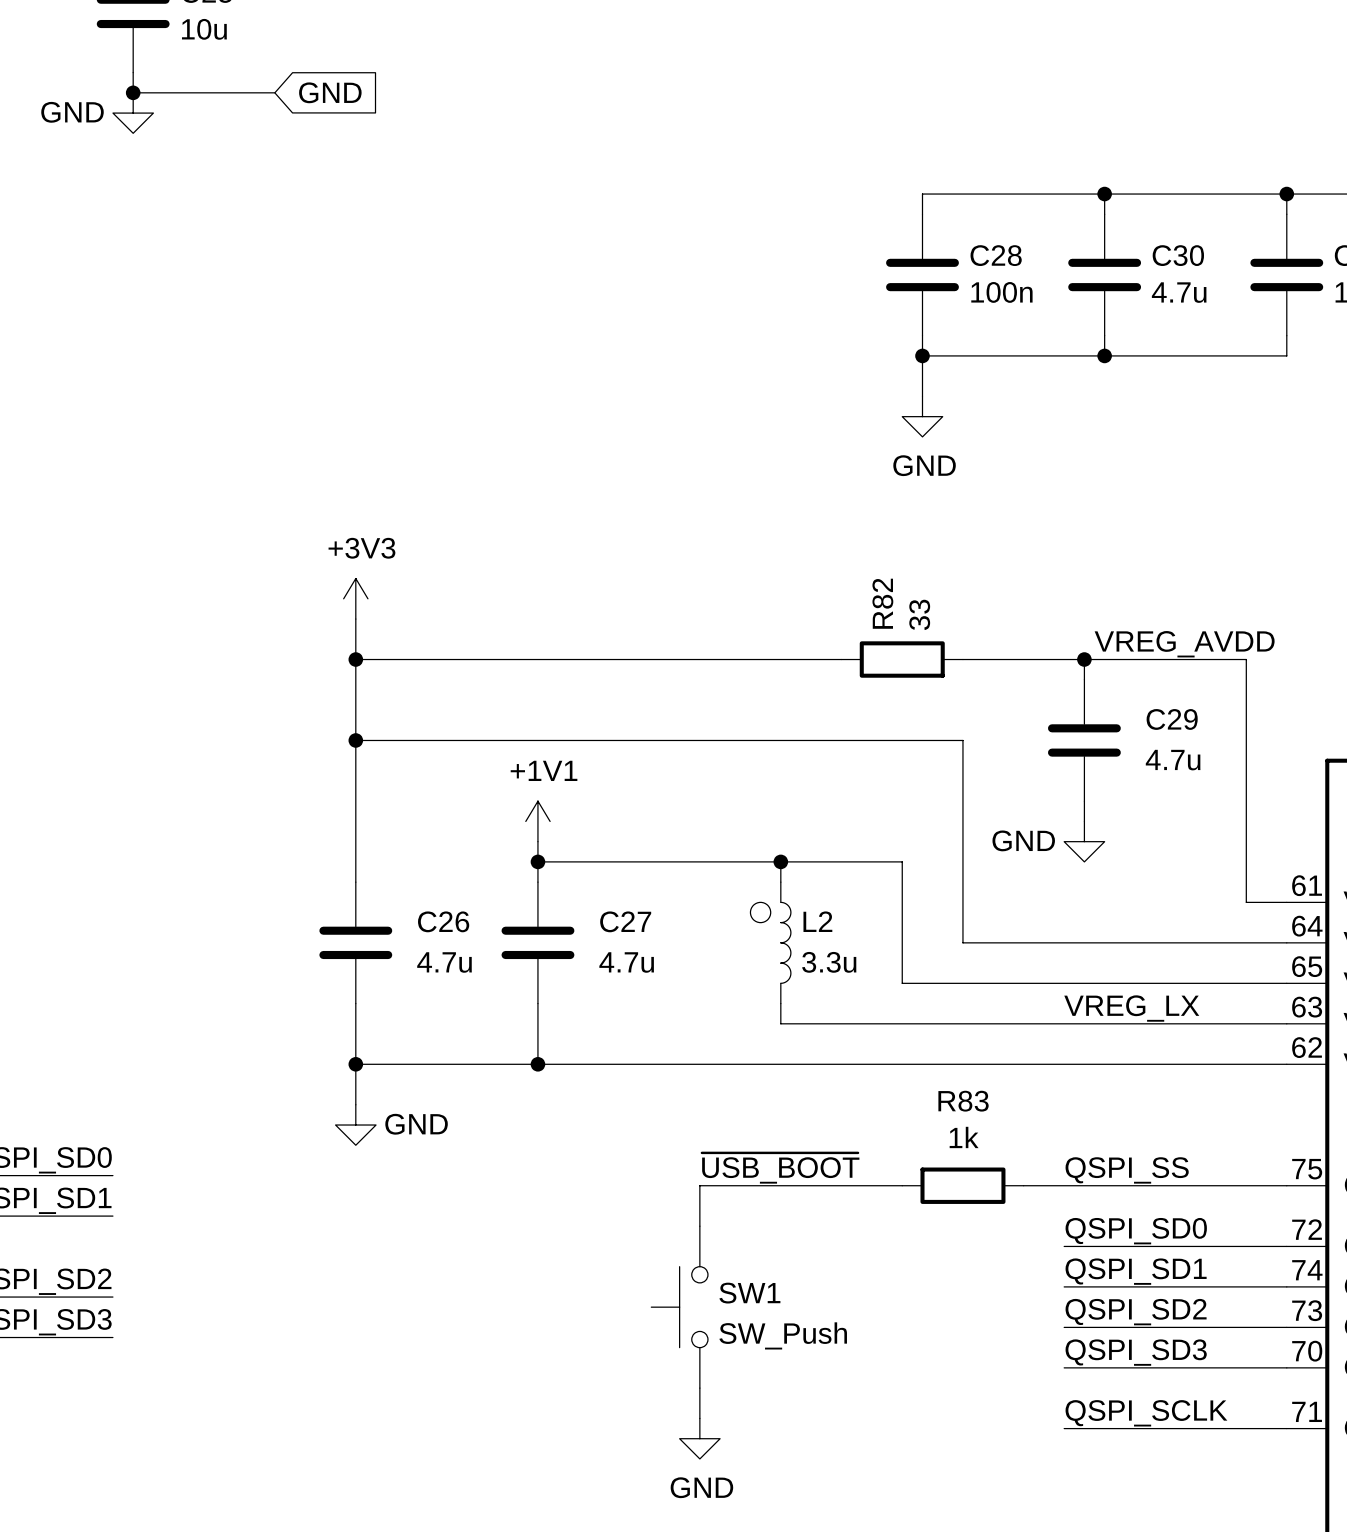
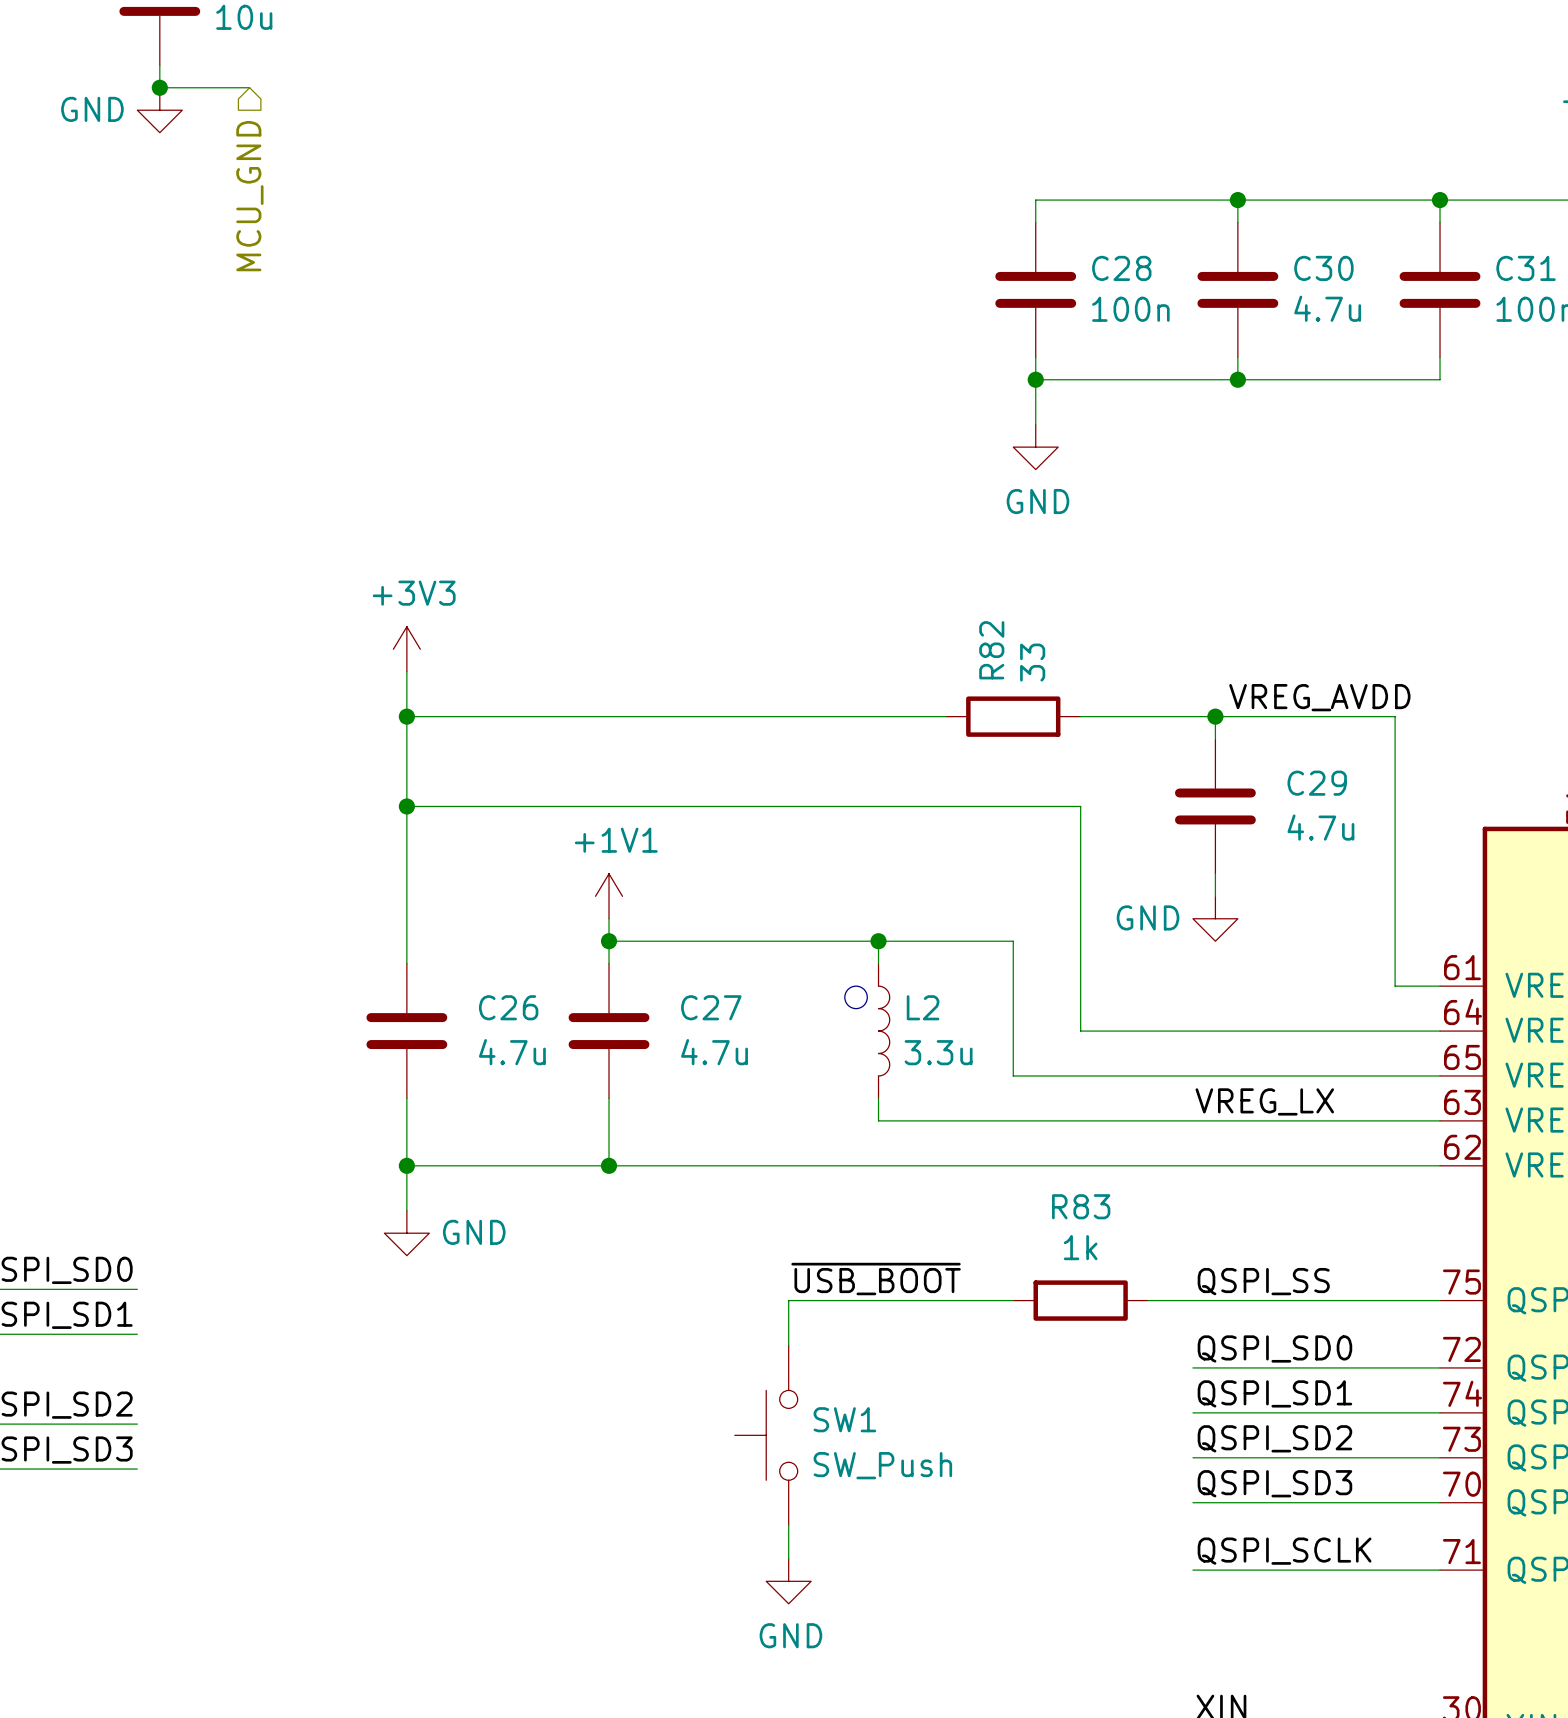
wire: (214, 92) (274, 92) -> none
global label: GND (330, 92) -> none
hierarchical label: none -> MCU_GND (249, 196)

